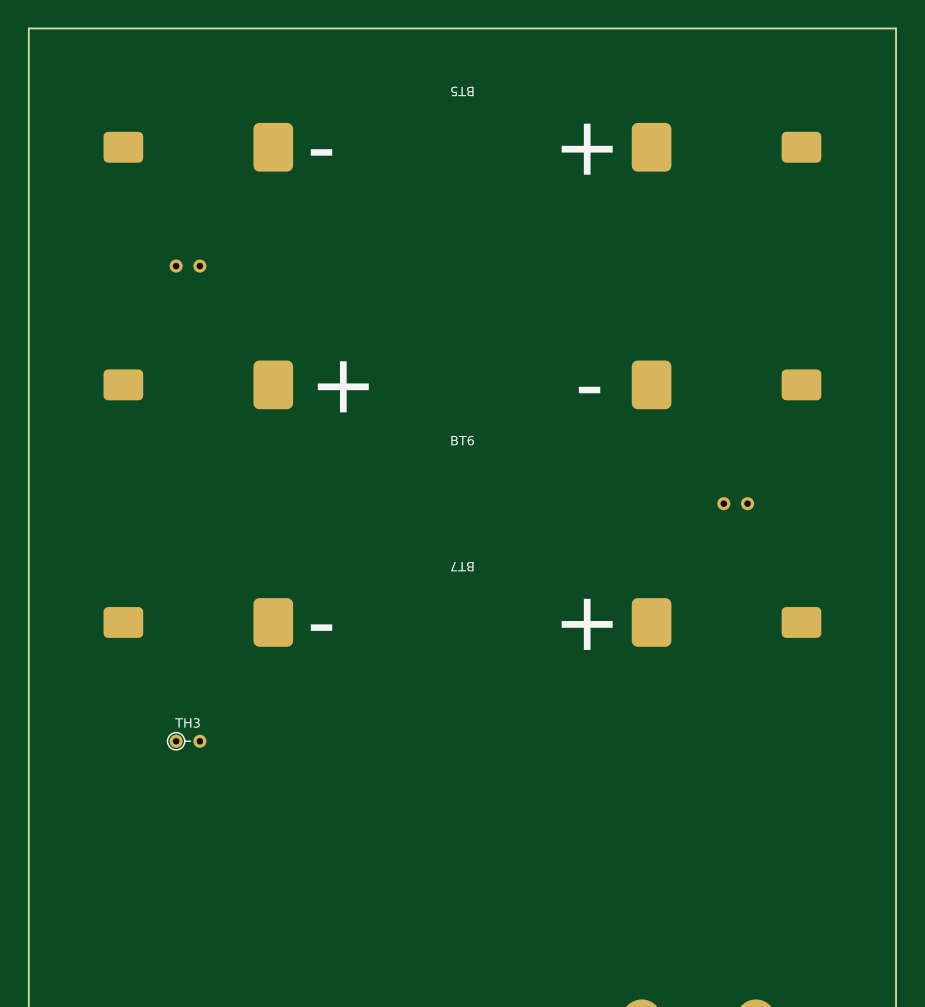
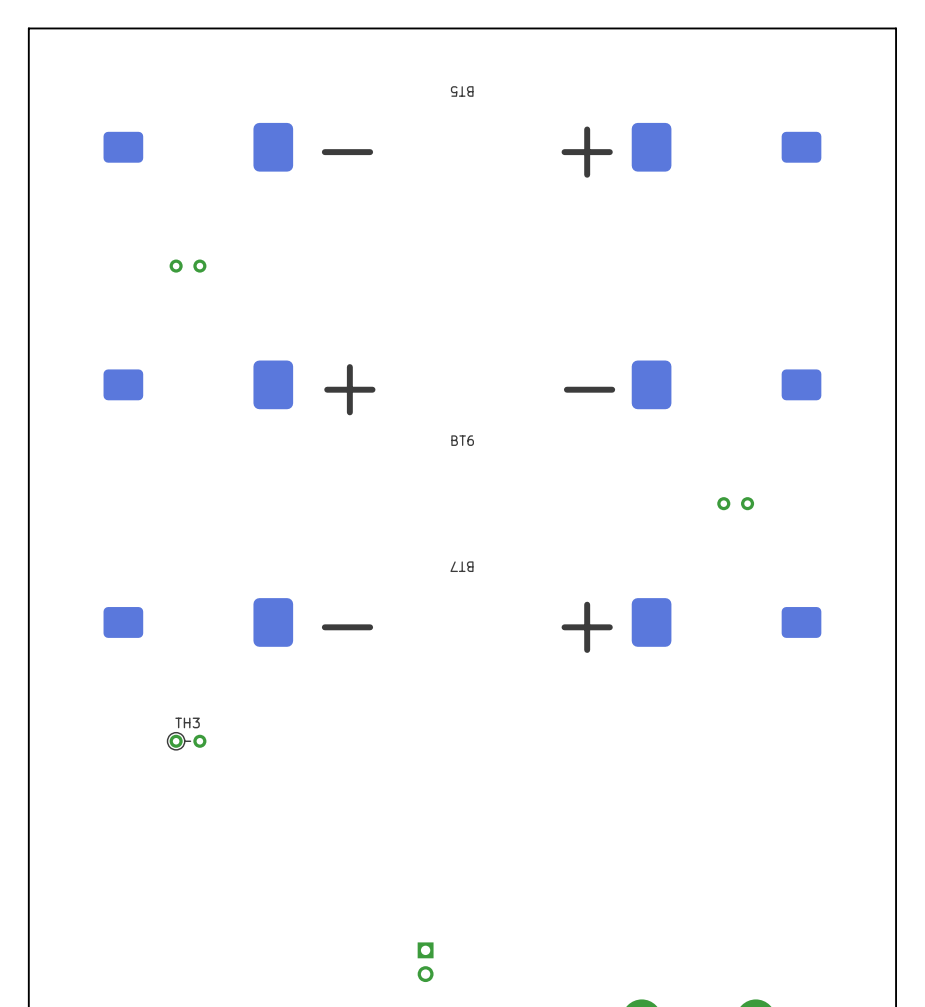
part: none -> (425, 962)

